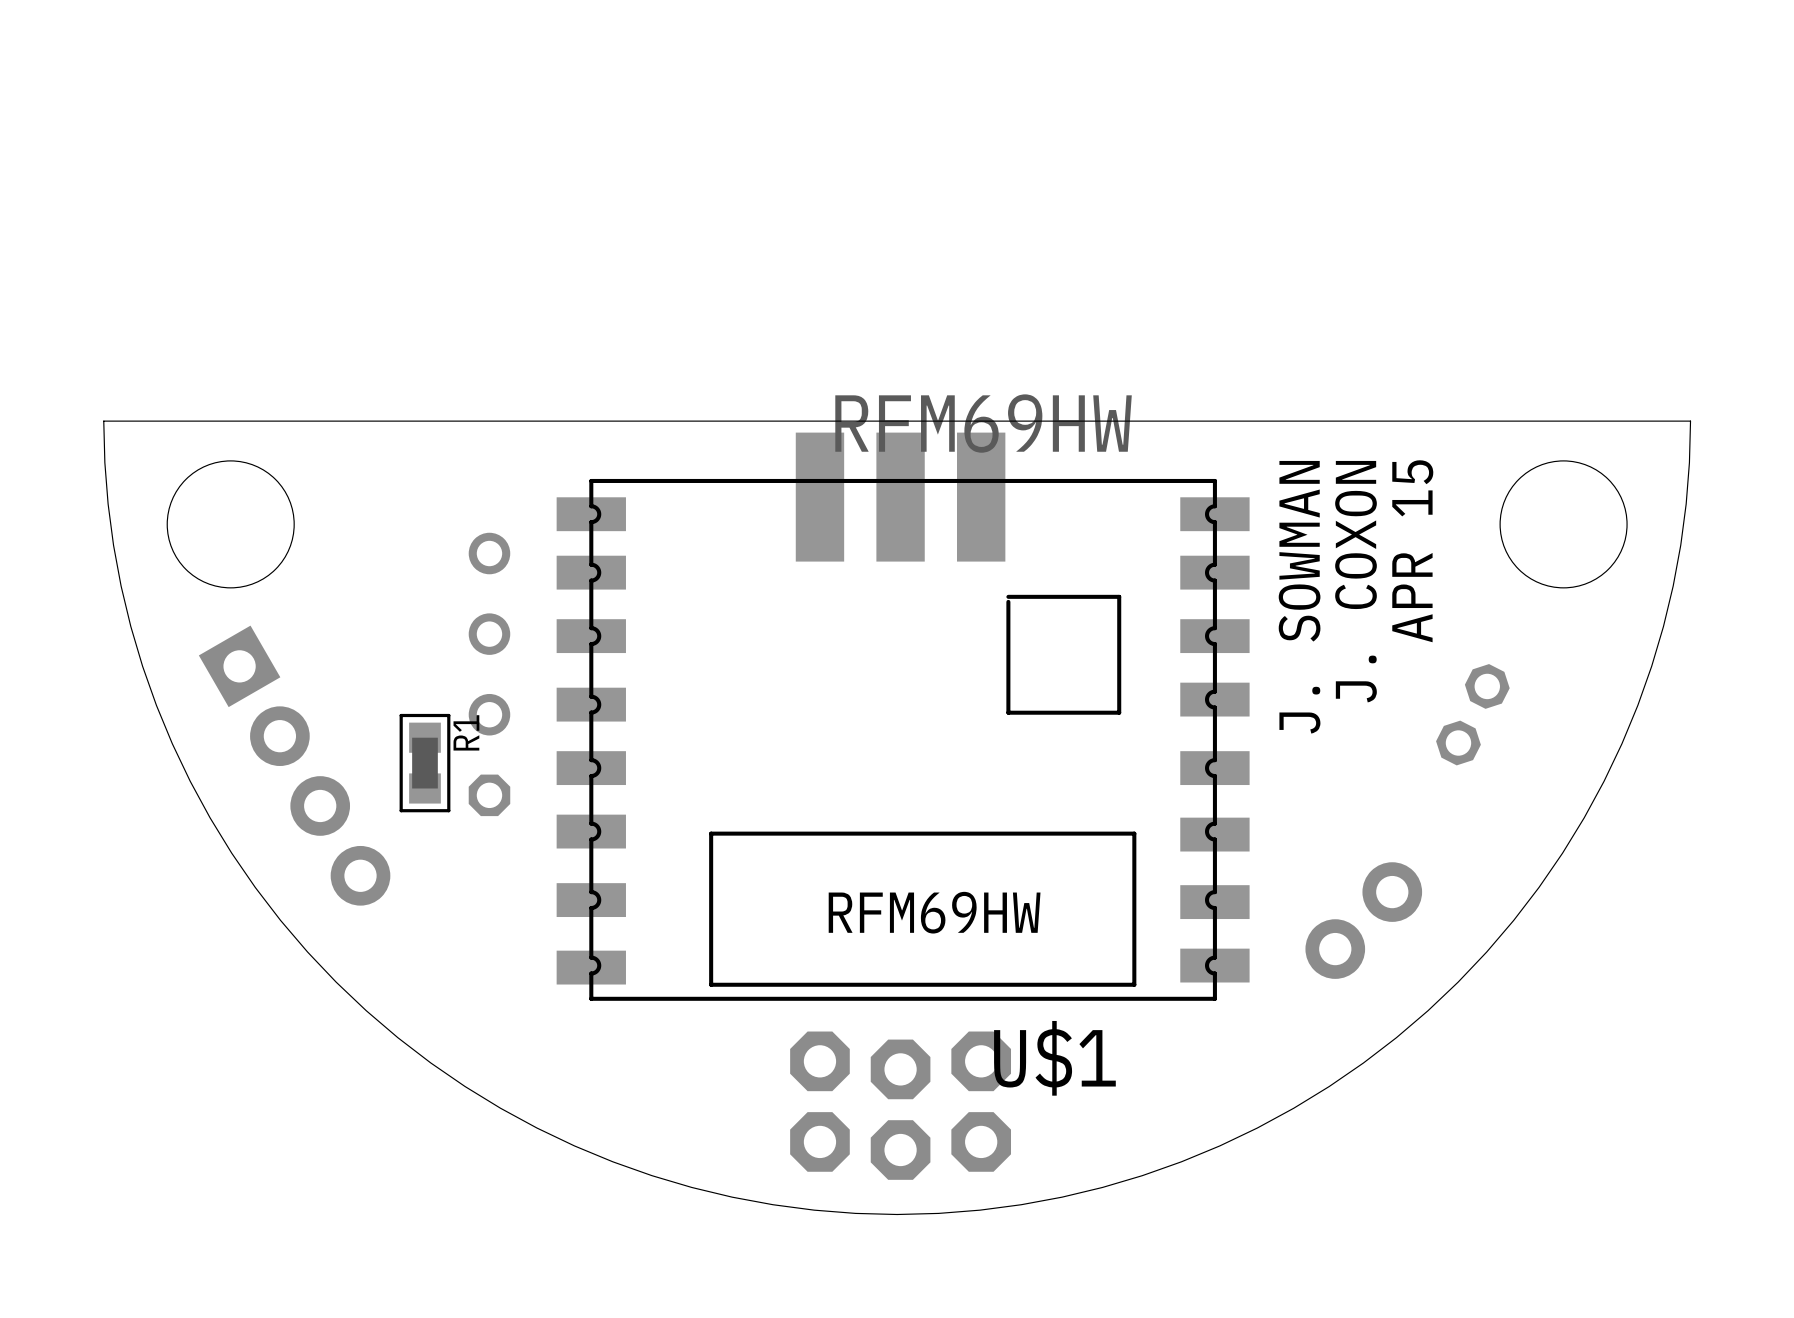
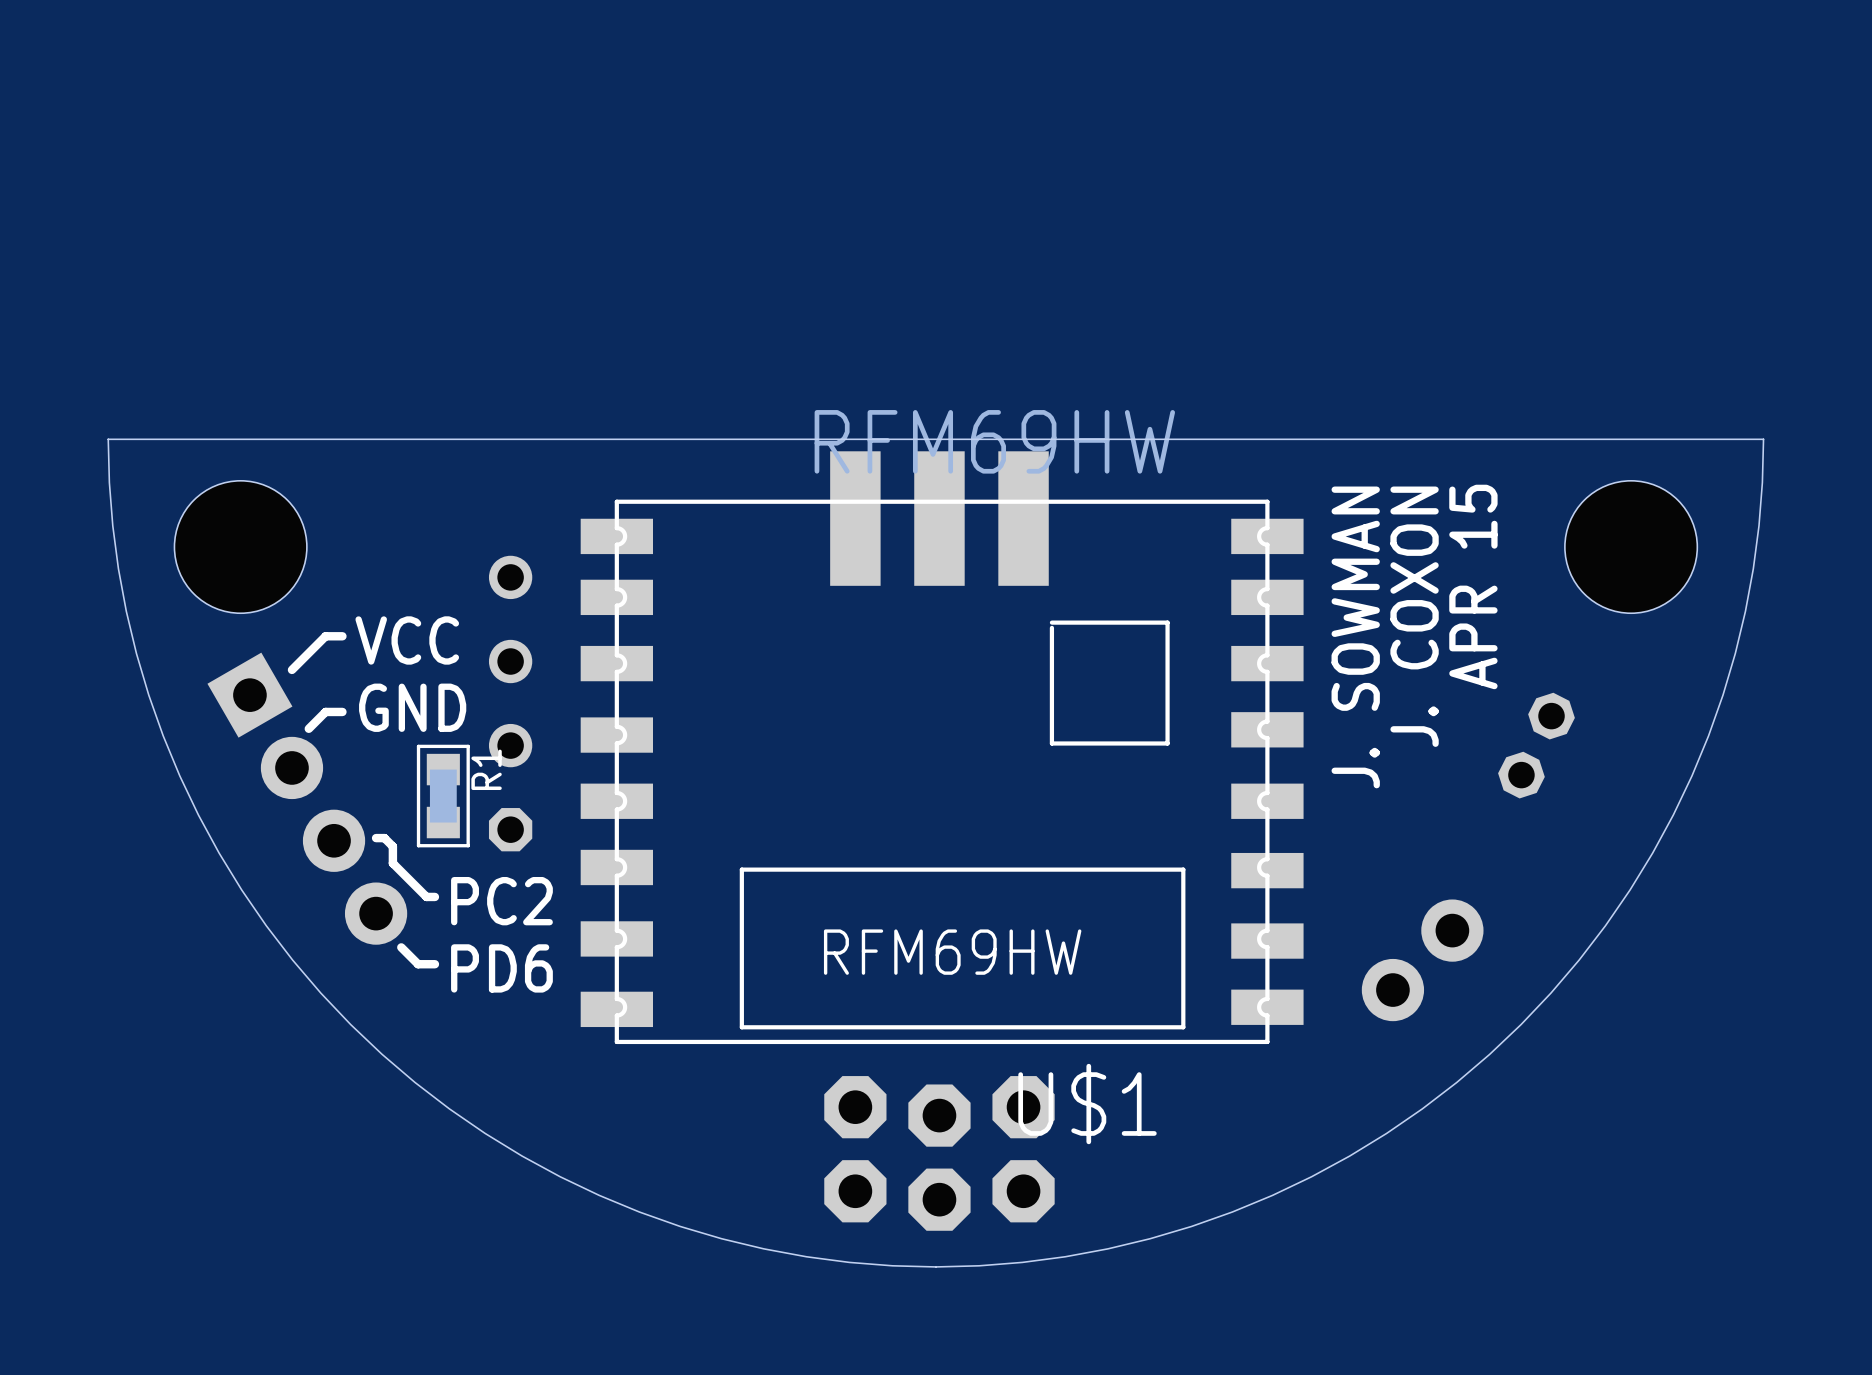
line: none -> (342, 636) (325, 636) (291, 669)
text: none -> VCC (407, 640)
text: none -> GND (412, 707)
line: none -> (342, 711) (325, 711) (308, 728)
line: none -> (376, 838) (384, 838) (392, 846) (392, 863) (426, 896) (434, 896)
text: none -> PC2 (501, 901)
line: none -> (401, 947) (418, 964) (434, 964)
text: none -> PD6 (501, 968)

